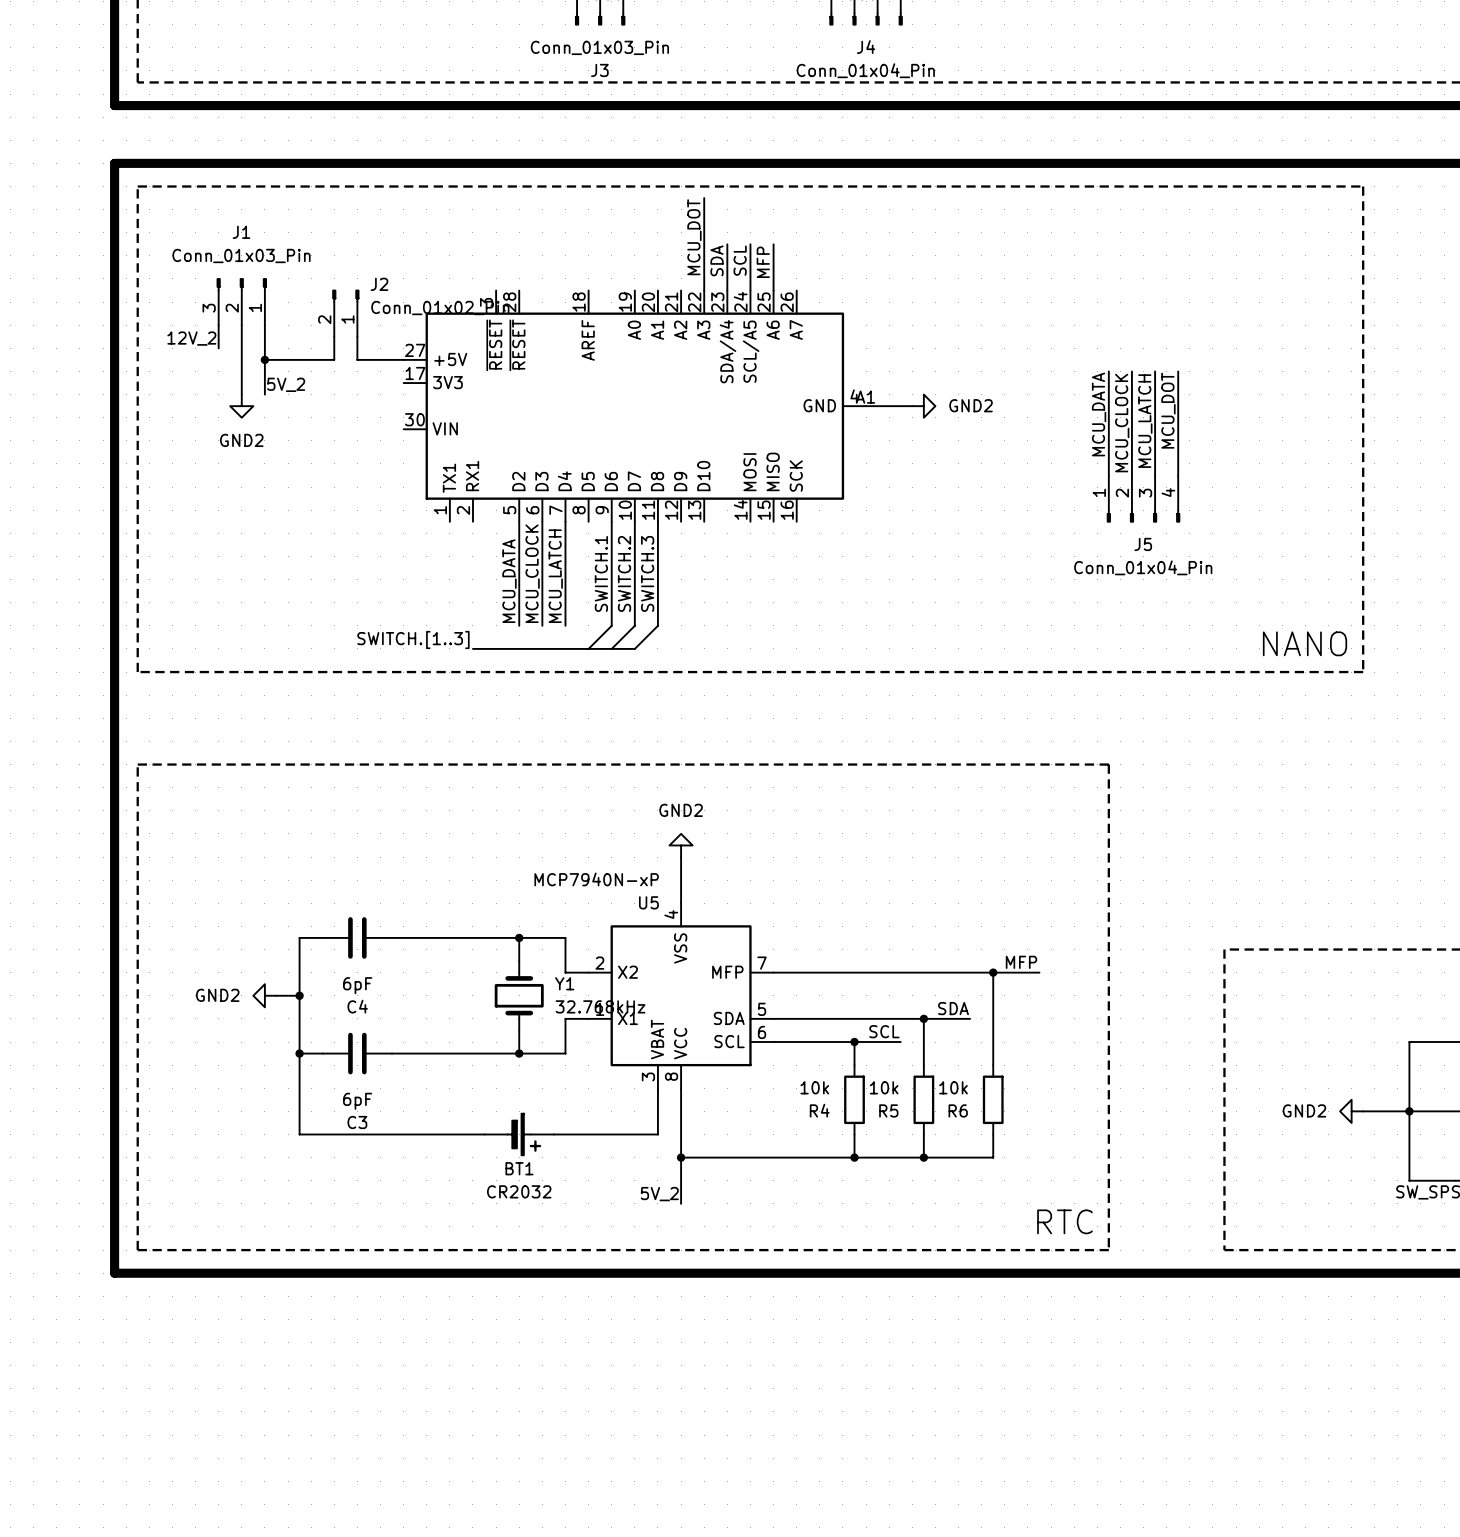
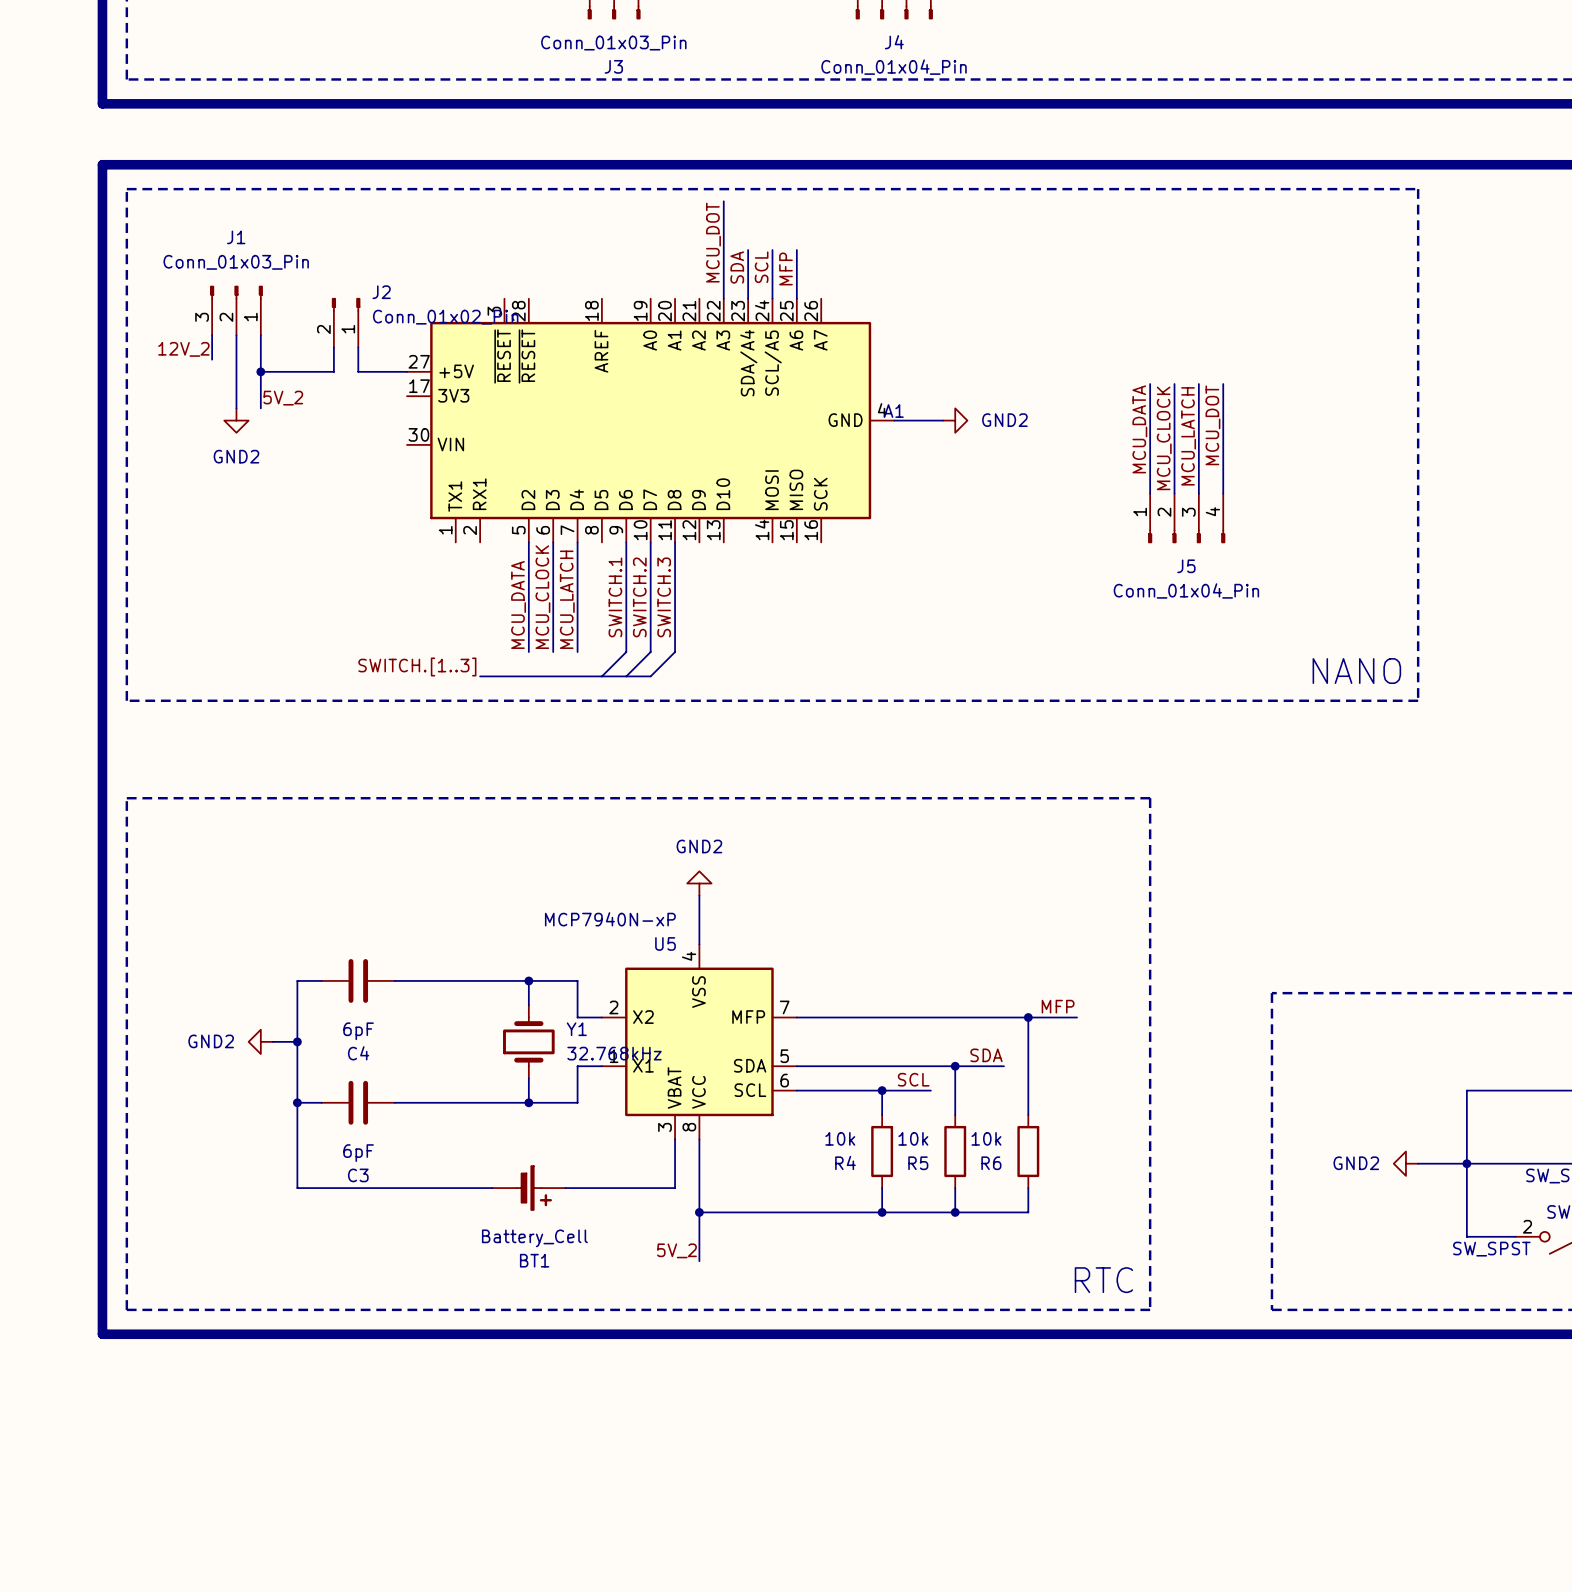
BT1 name position: BT1 (519, 1168) -> BT1 (534, 1260)
BT1 value: CR2032 (519, 1191) -> Battery_Cell (534, 1238)

